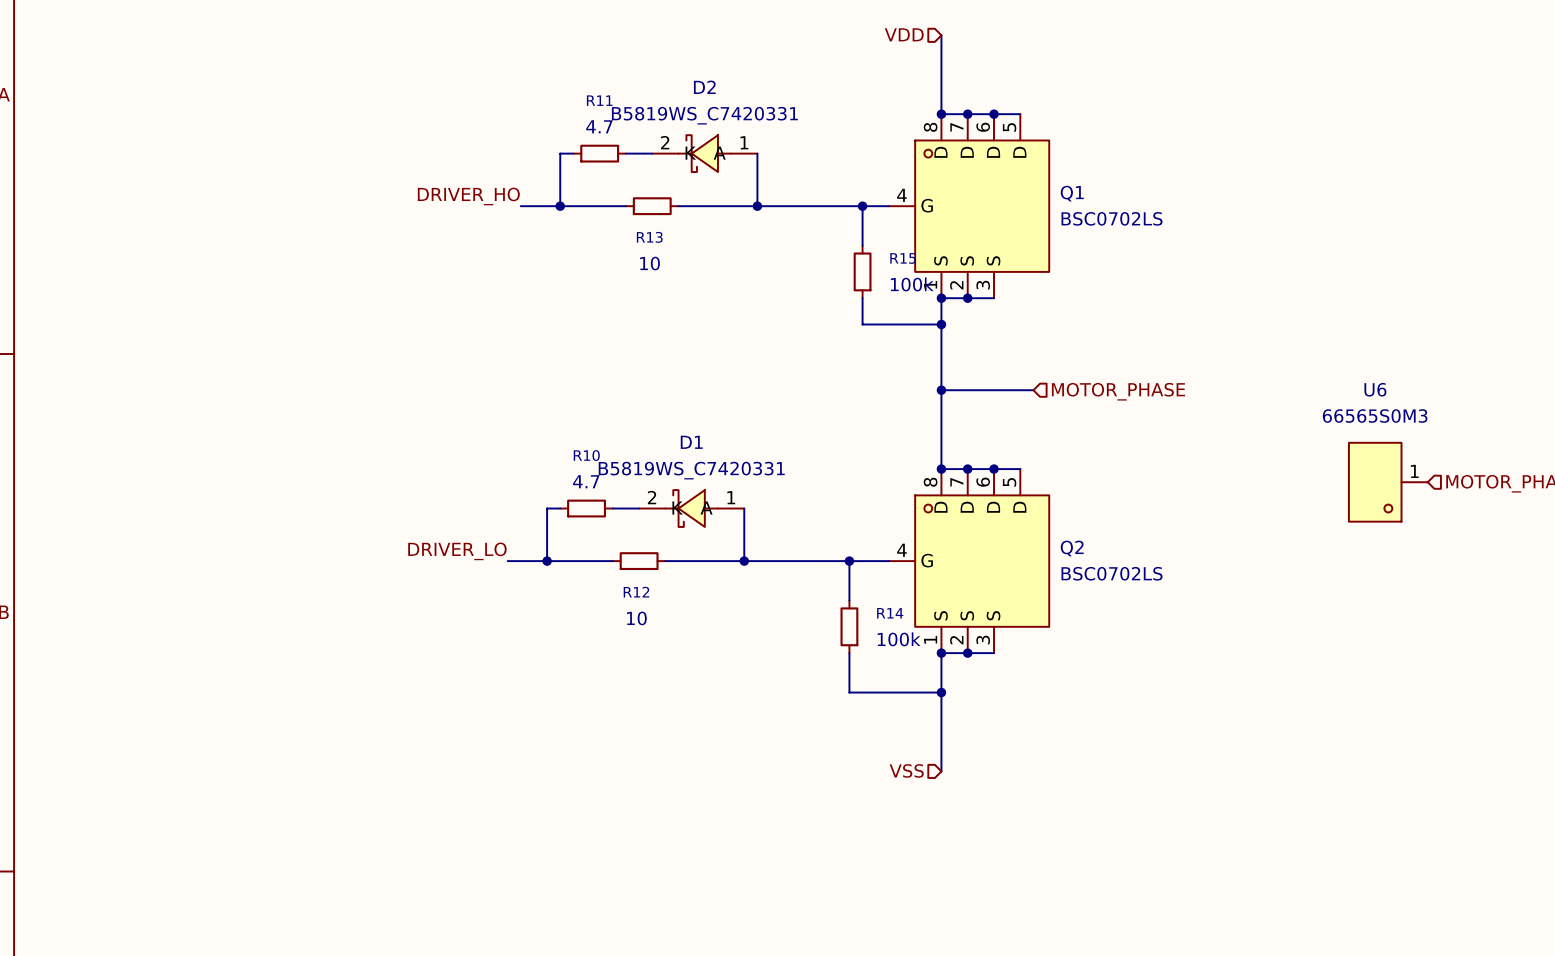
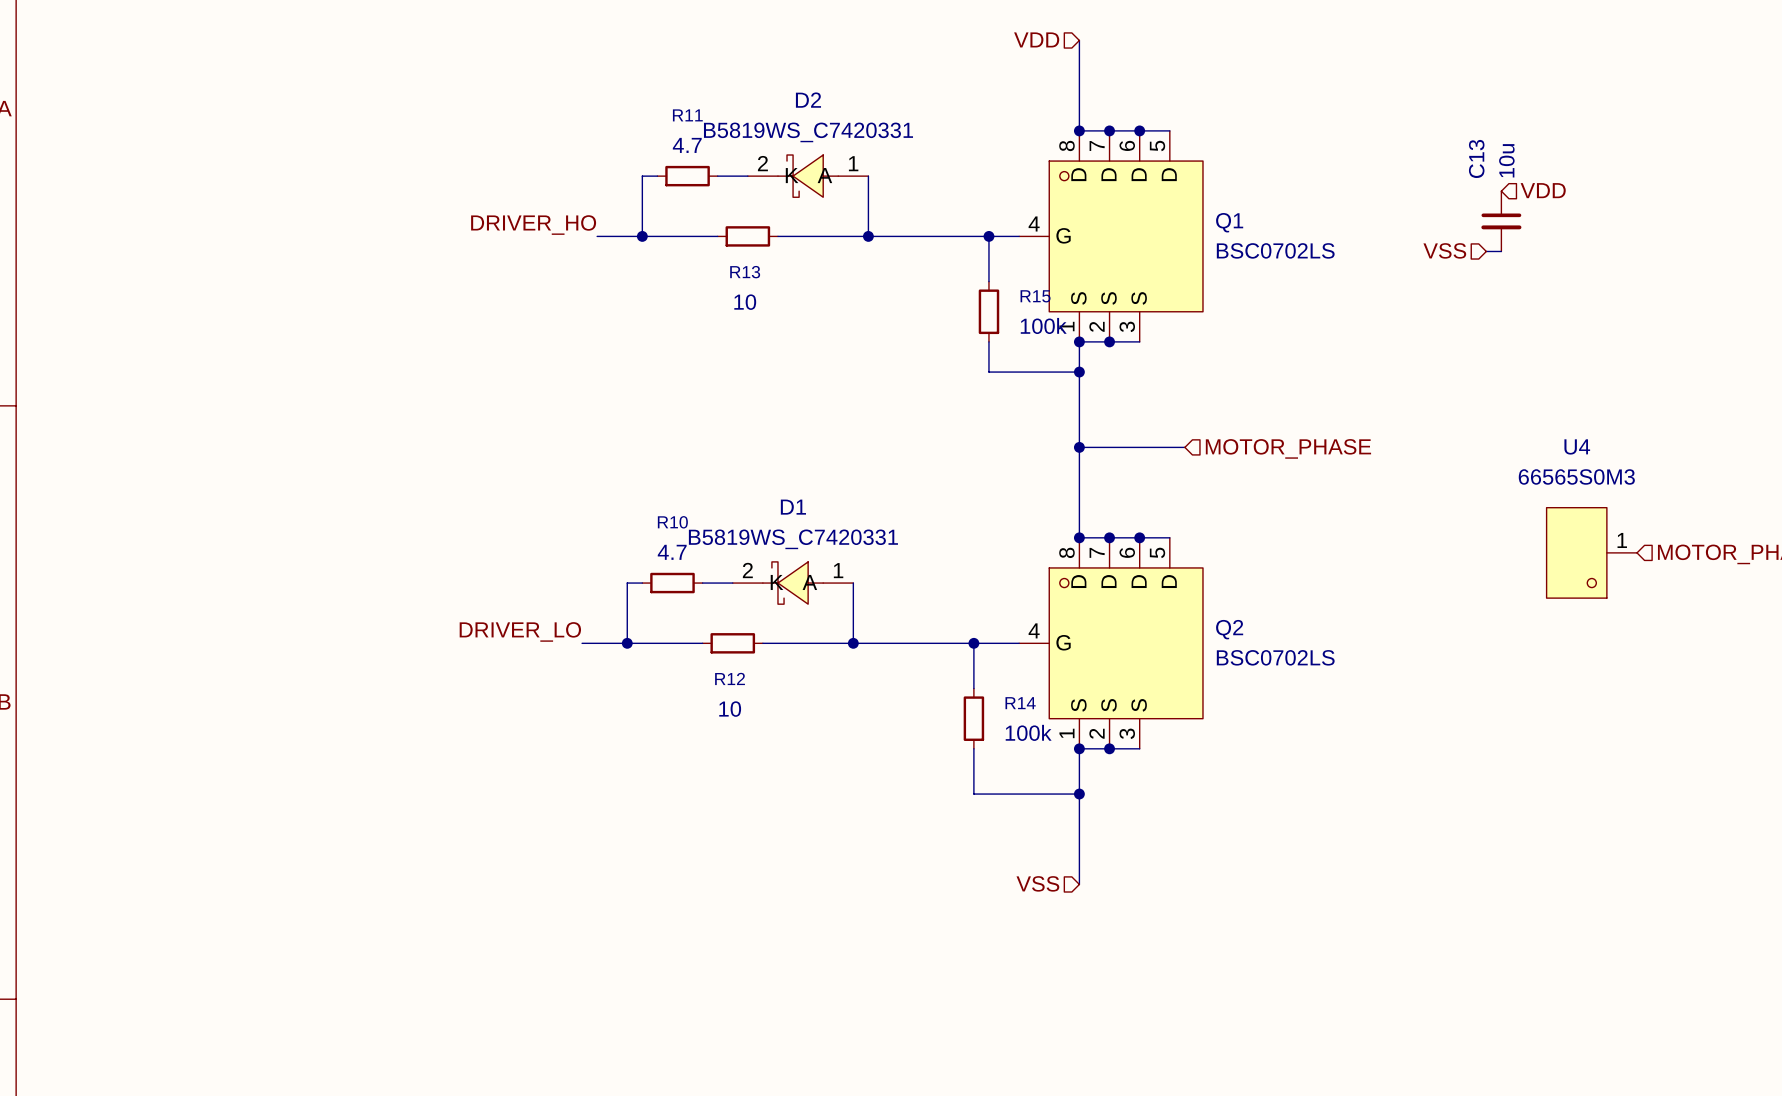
hierarchical label: none -> VDD (1543, 190)
C13: none -> 10u (1501, 221)
hierarchical label: none -> VSS (1444, 250)
wire: none -> (1486, 251) (1501, 251)
U6 name: U6 (1375, 389) -> U4 (1577, 446)

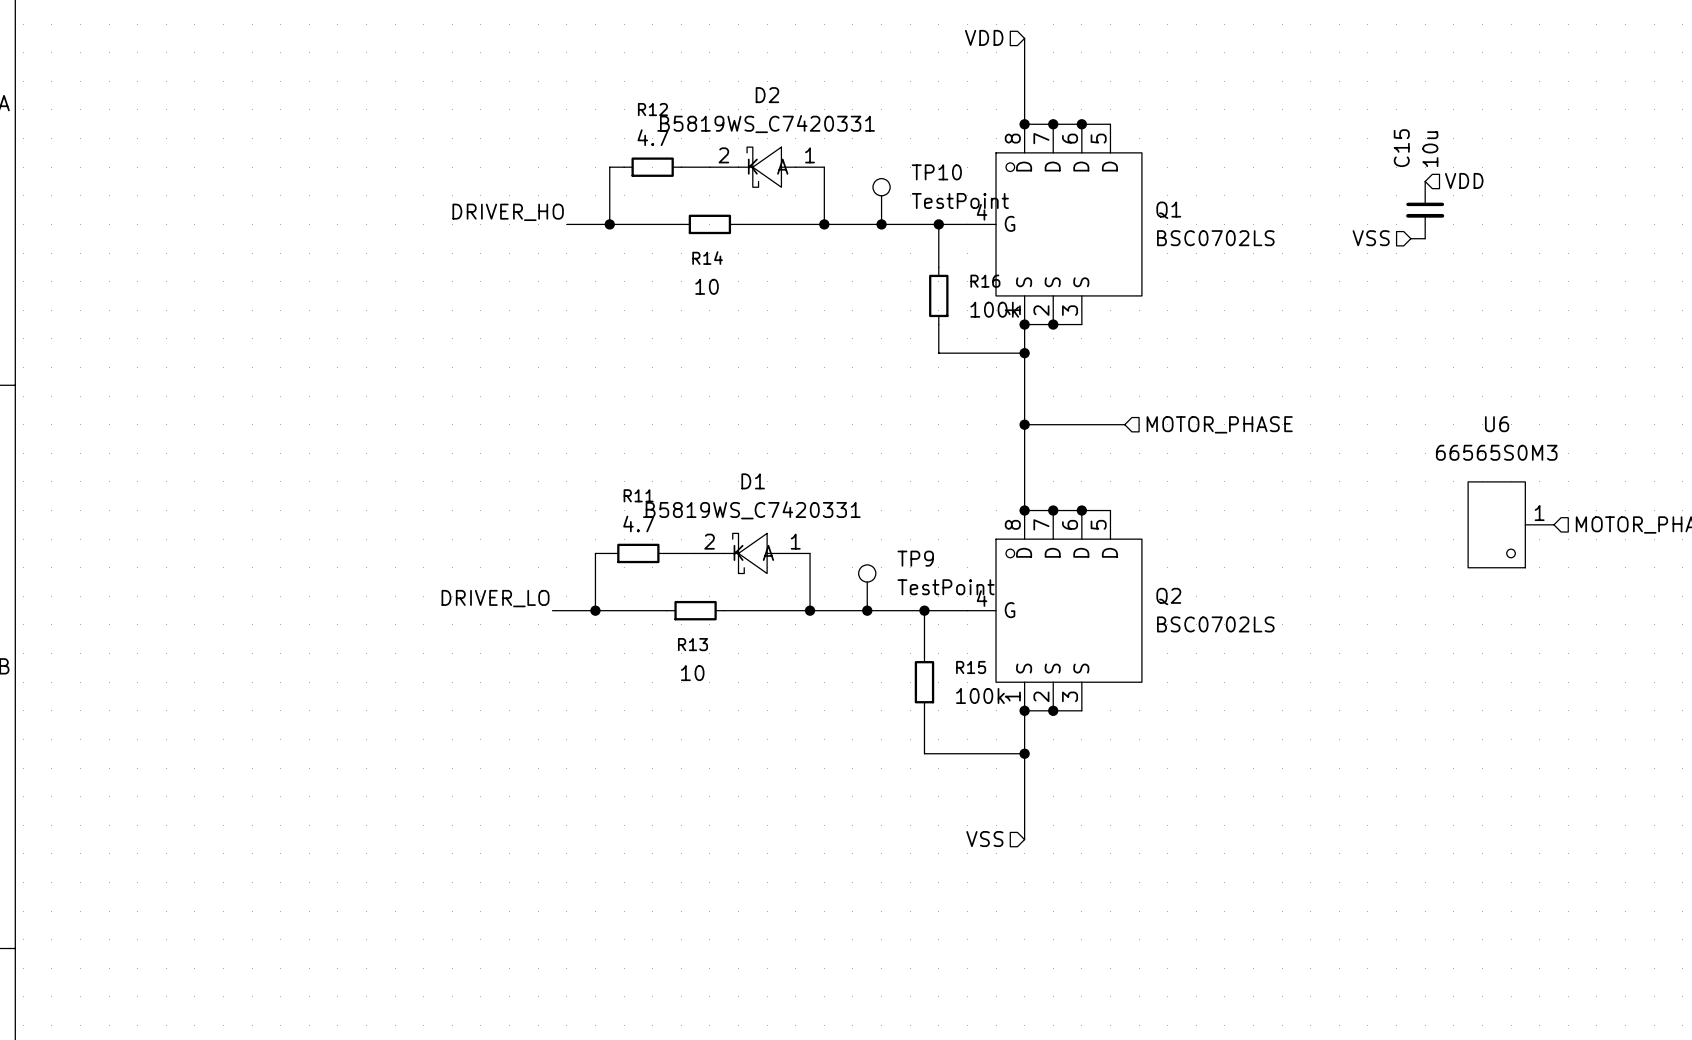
R11 name: R11 (687, 115) -> R12 (652, 109)
C13 name: C13 (1476, 158) -> C15 (1401, 148)
TP10: none -> TestPoint (881, 201)
junction: none -> (881, 224)
R13 name: R13 (745, 272) -> R14 (707, 258)
R15 name: R15 (1035, 296) -> R16 (985, 281)
U4 name: U4 (1577, 446) -> U6 (1497, 424)
R10 name: R10 (672, 522) -> R11 (638, 495)
TP9: none -> TestPoint (867, 587)
junction: none -> (867, 610)
R12 name: R12 (730, 678) -> R13 (692, 644)
R14 name: R14 (1020, 703) -> R15 (971, 667)

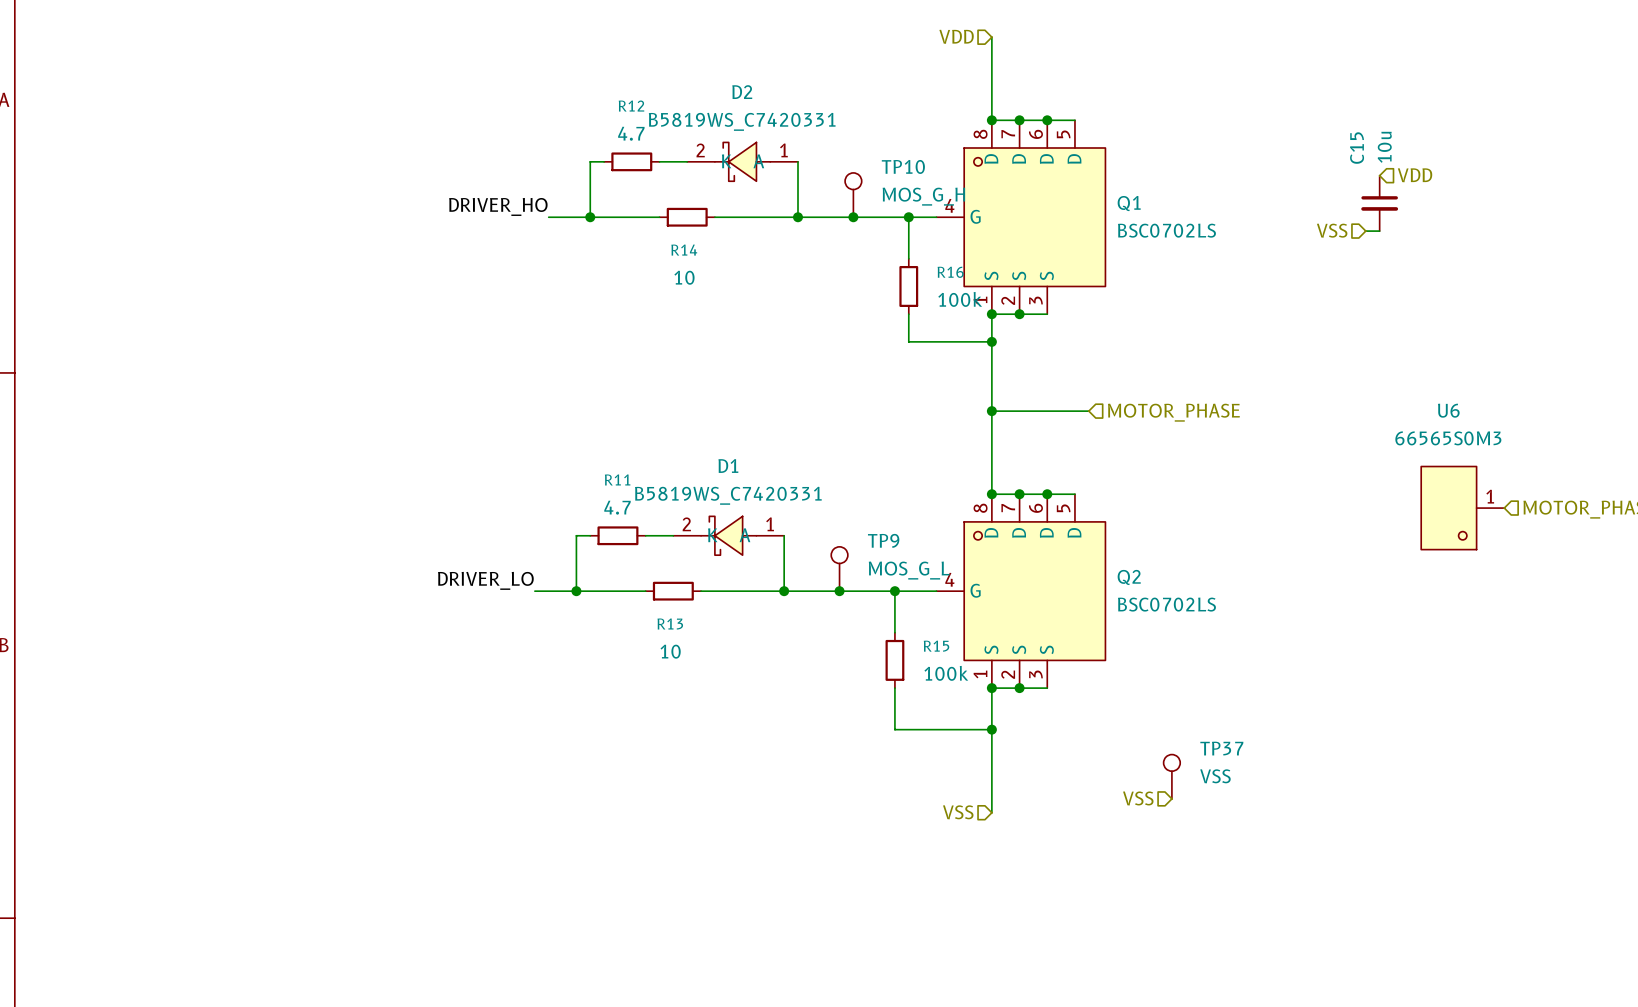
TP10 value: TestPoint (960, 200) -> MOS_G_H (923, 196)
TP9 value: TestPoint (946, 587) -> MOS_G_L (909, 570)
TP37: none -> VSS (1171, 776)
hierarchical label: none -> VSS (1138, 798)

